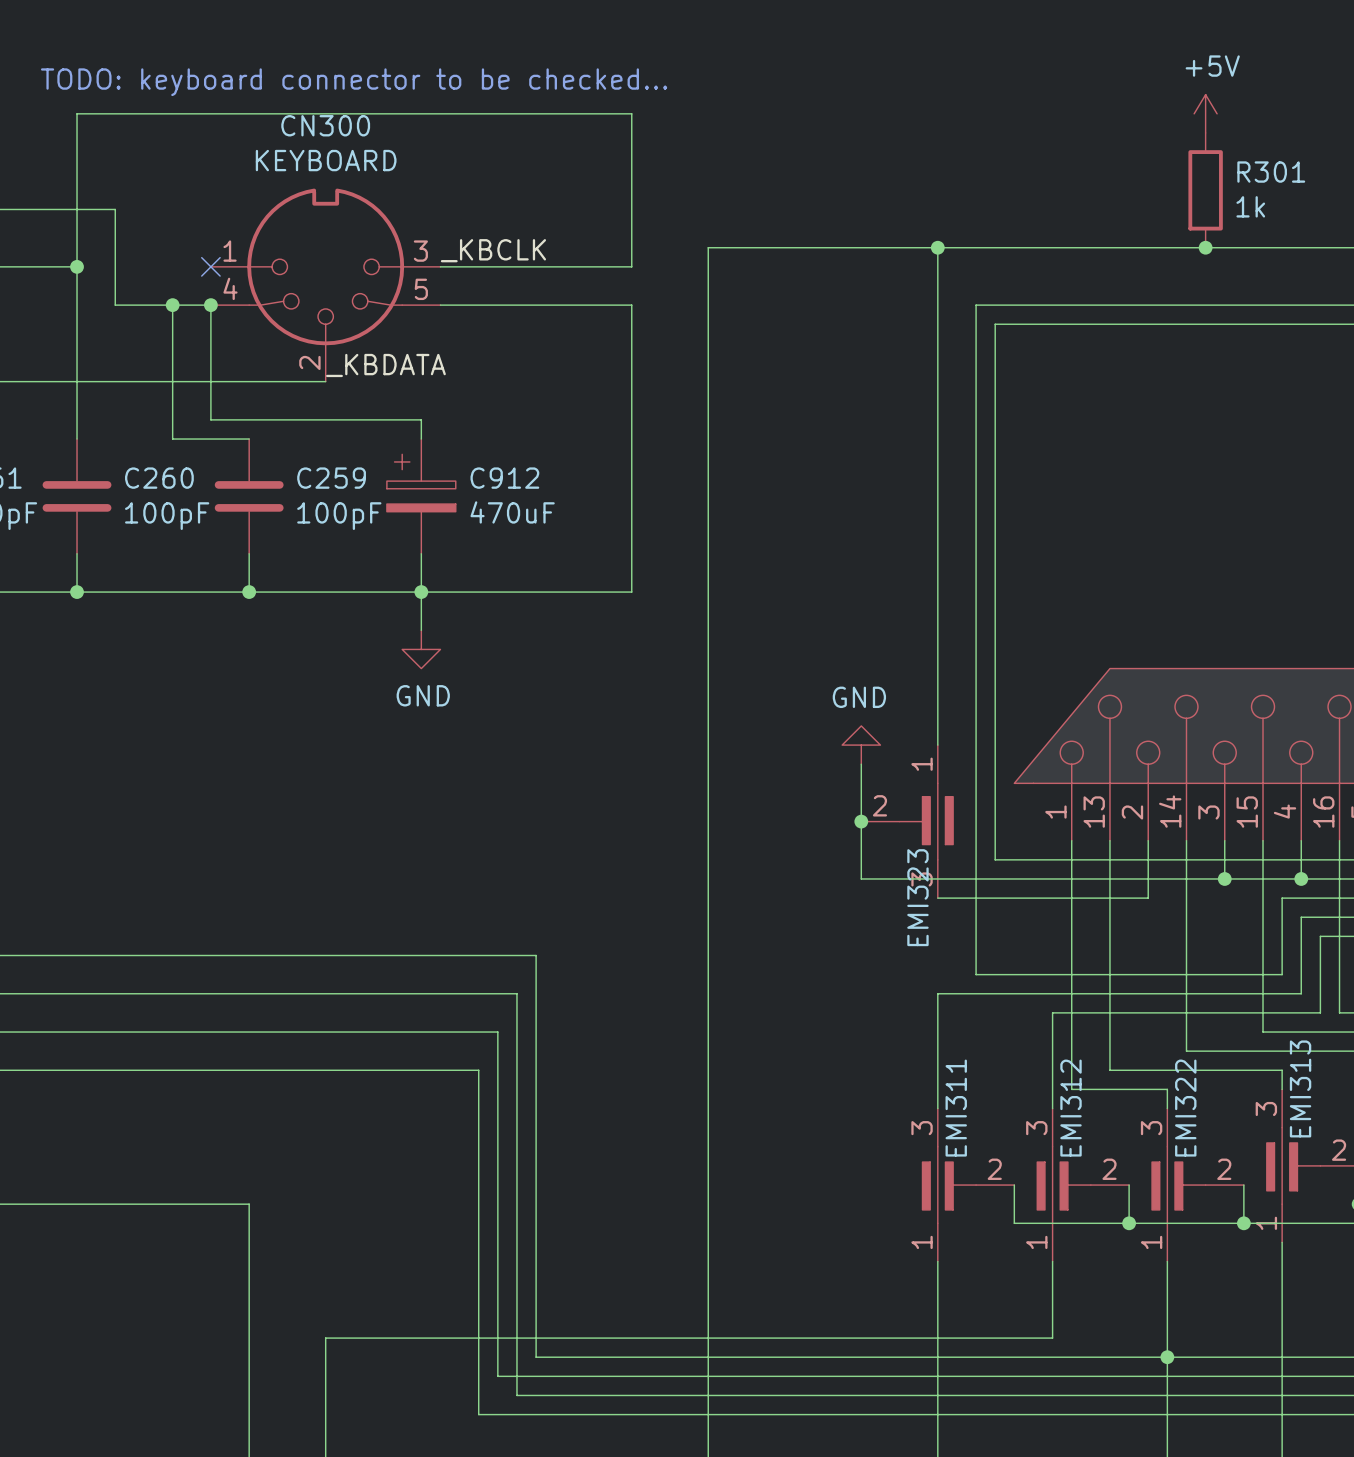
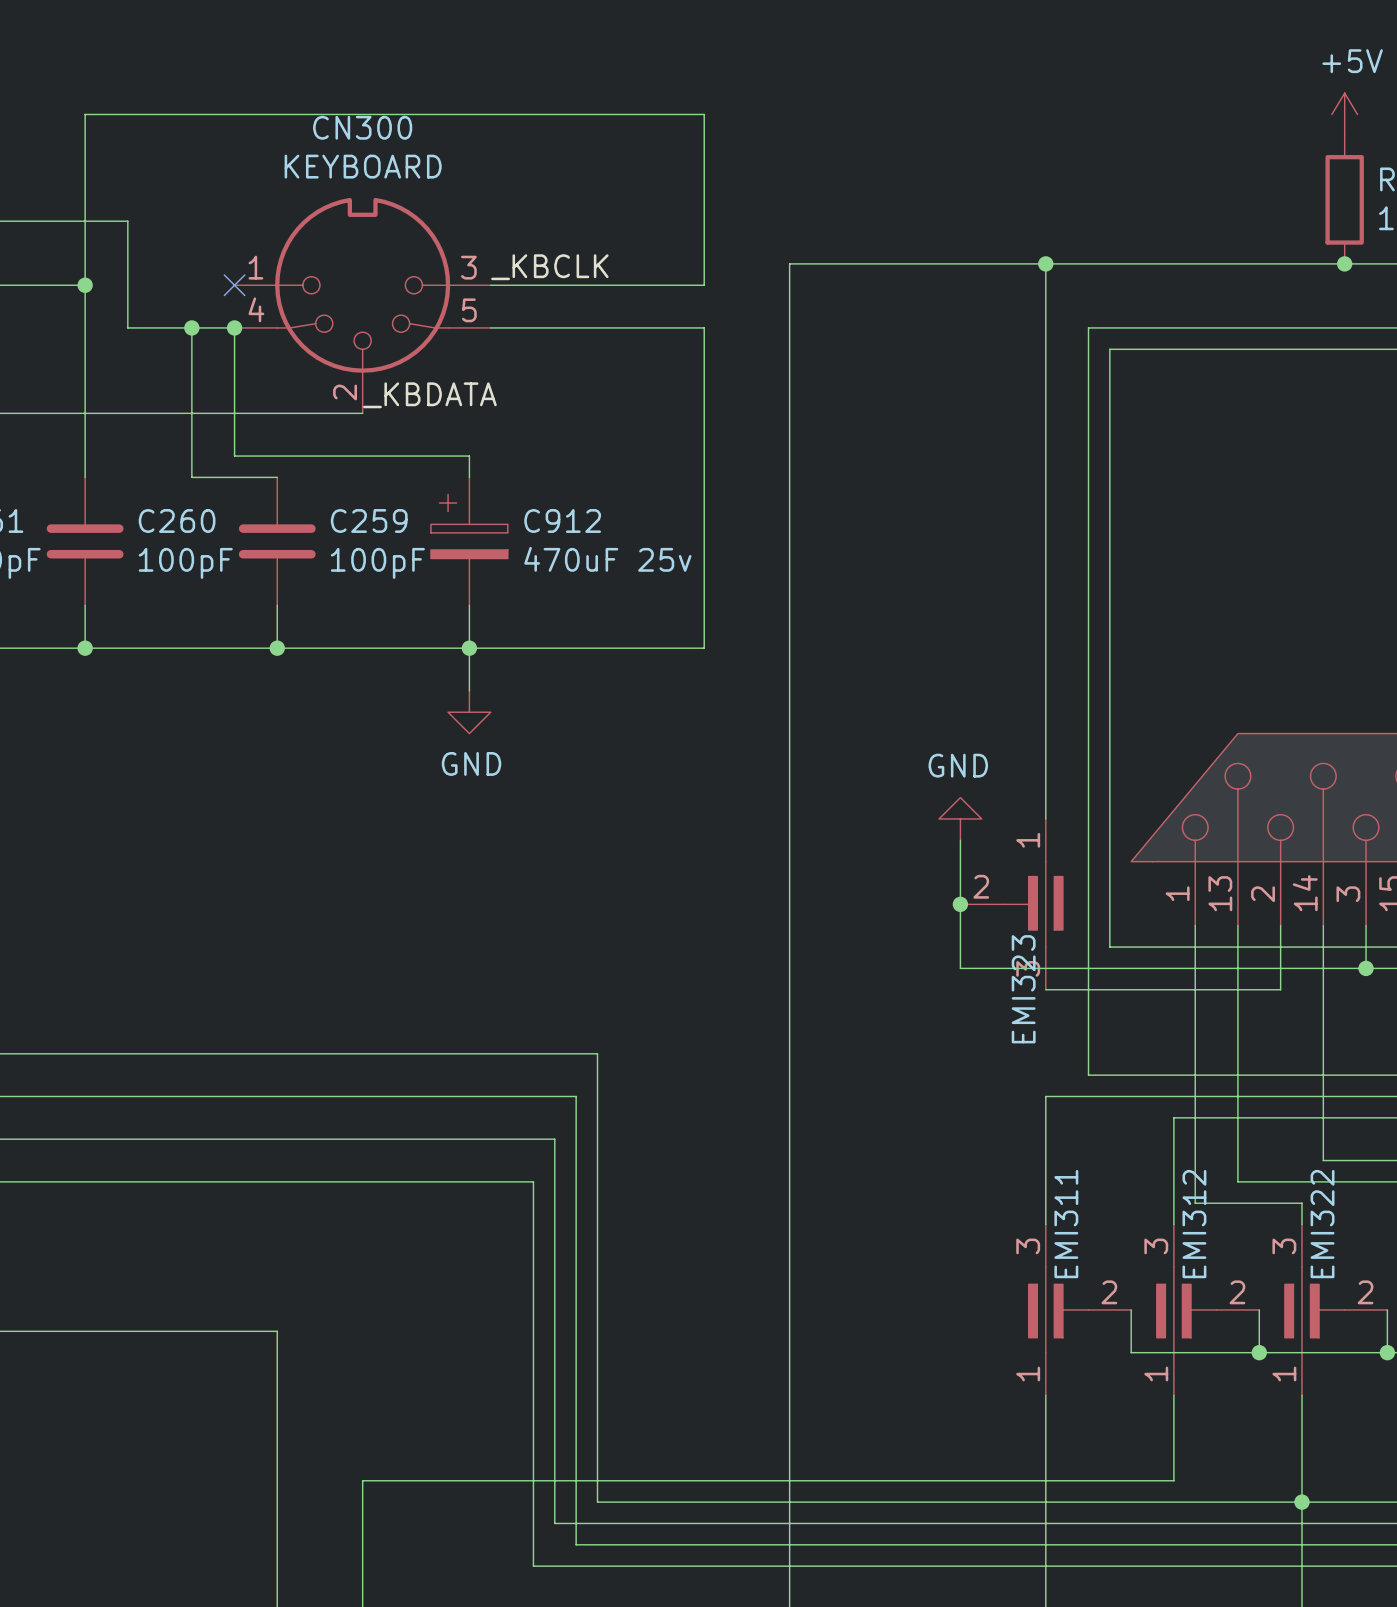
text: TODO: keyboard connector to be checked... (354, 82) -> none
C912 value: 470uF (512, 512) -> 470uF 25v (607, 559)

